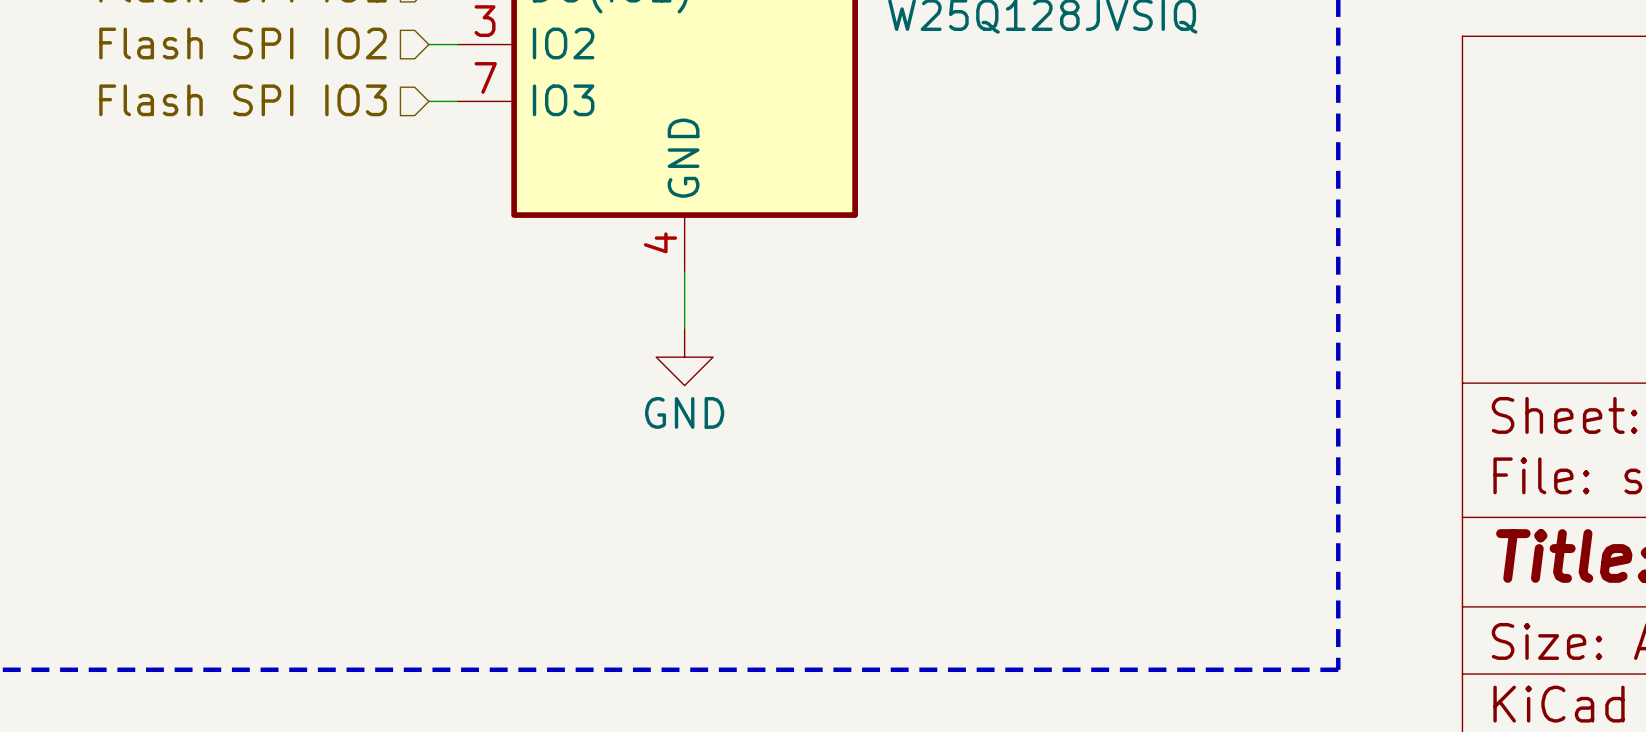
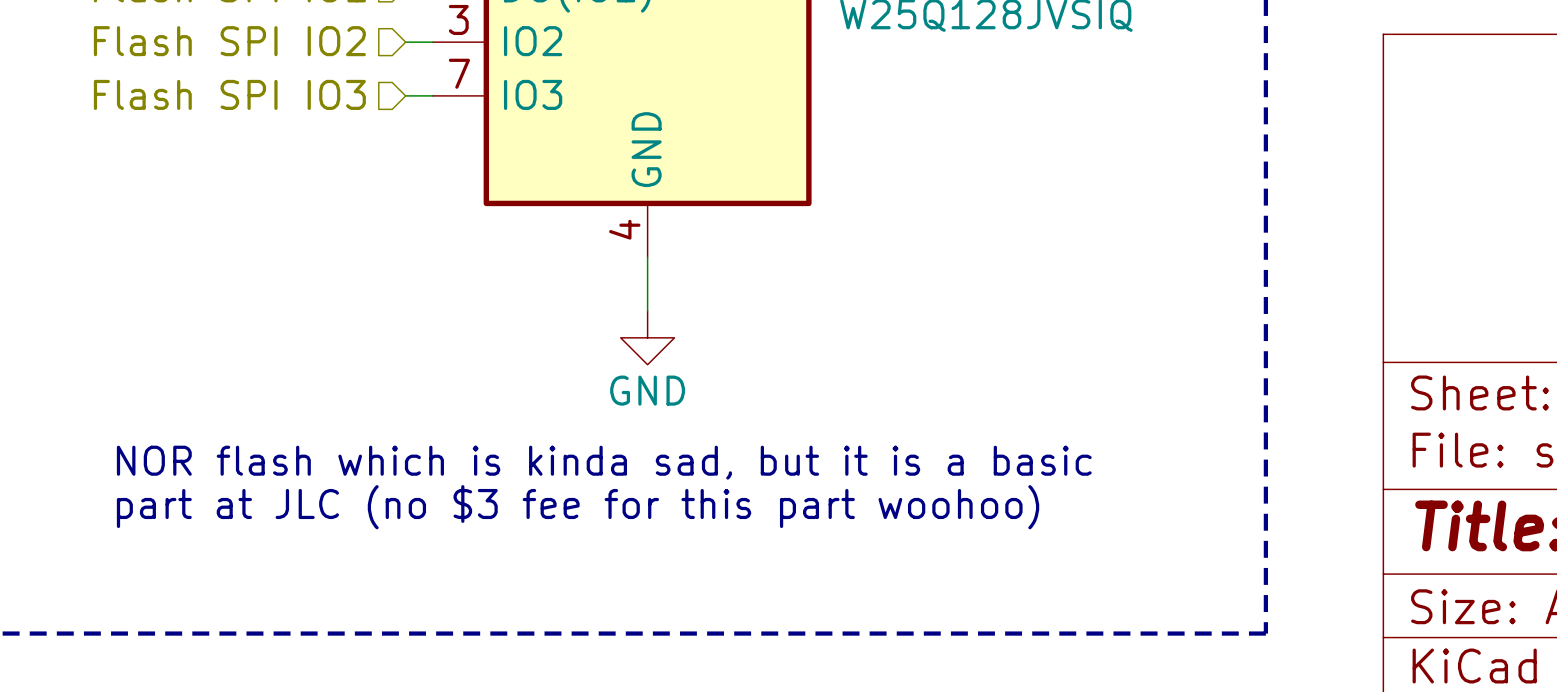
text: none -> NOR flash which is kinda sad, but it is a basic (604, 462)
text: none -> part at JLC (no $3 fee for this part woohoo) (578, 507)

